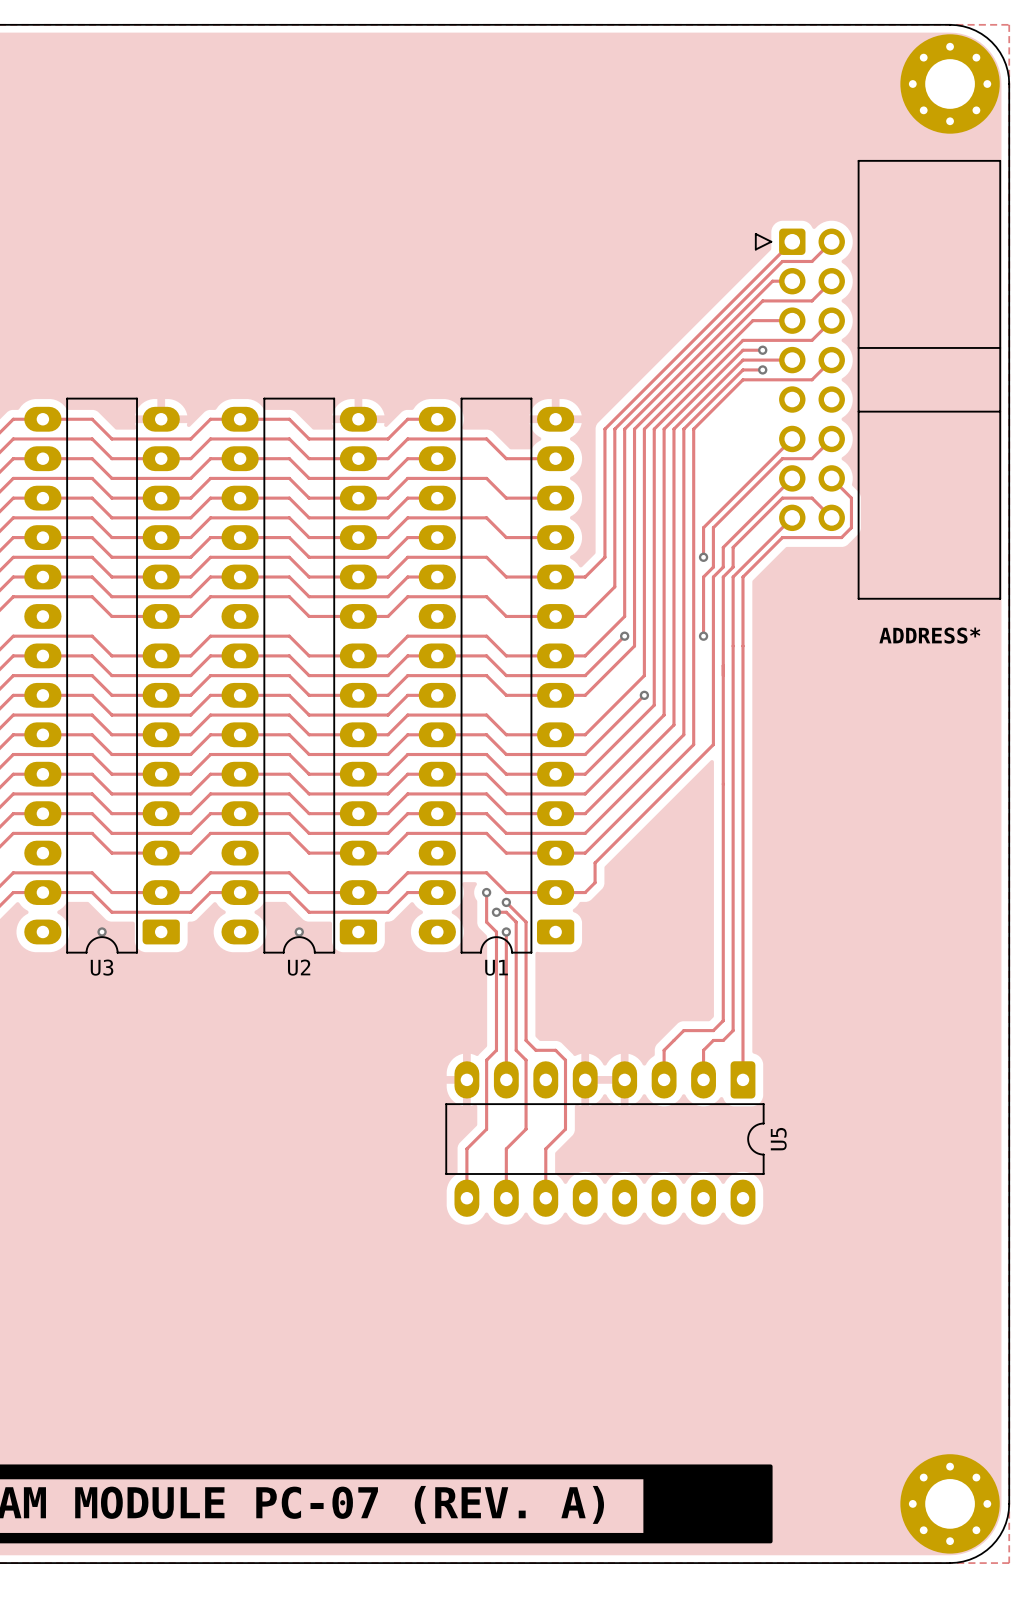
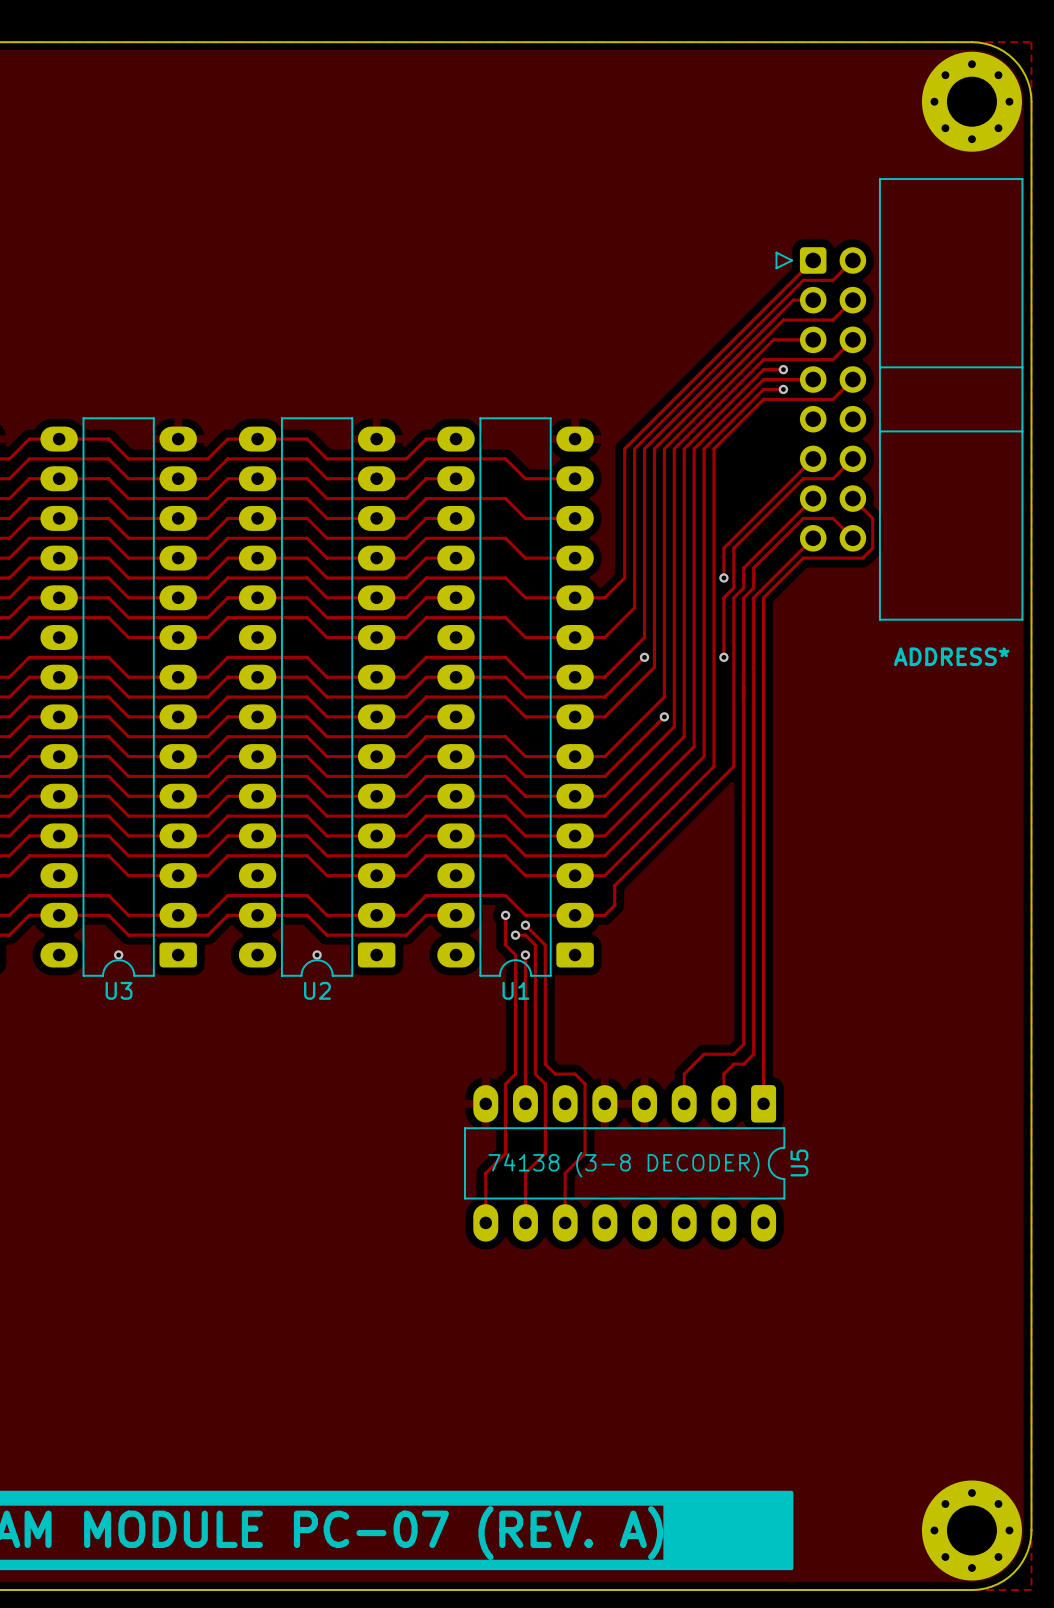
text: none -> 74138 (3-8 DECODER) (623, 1164)

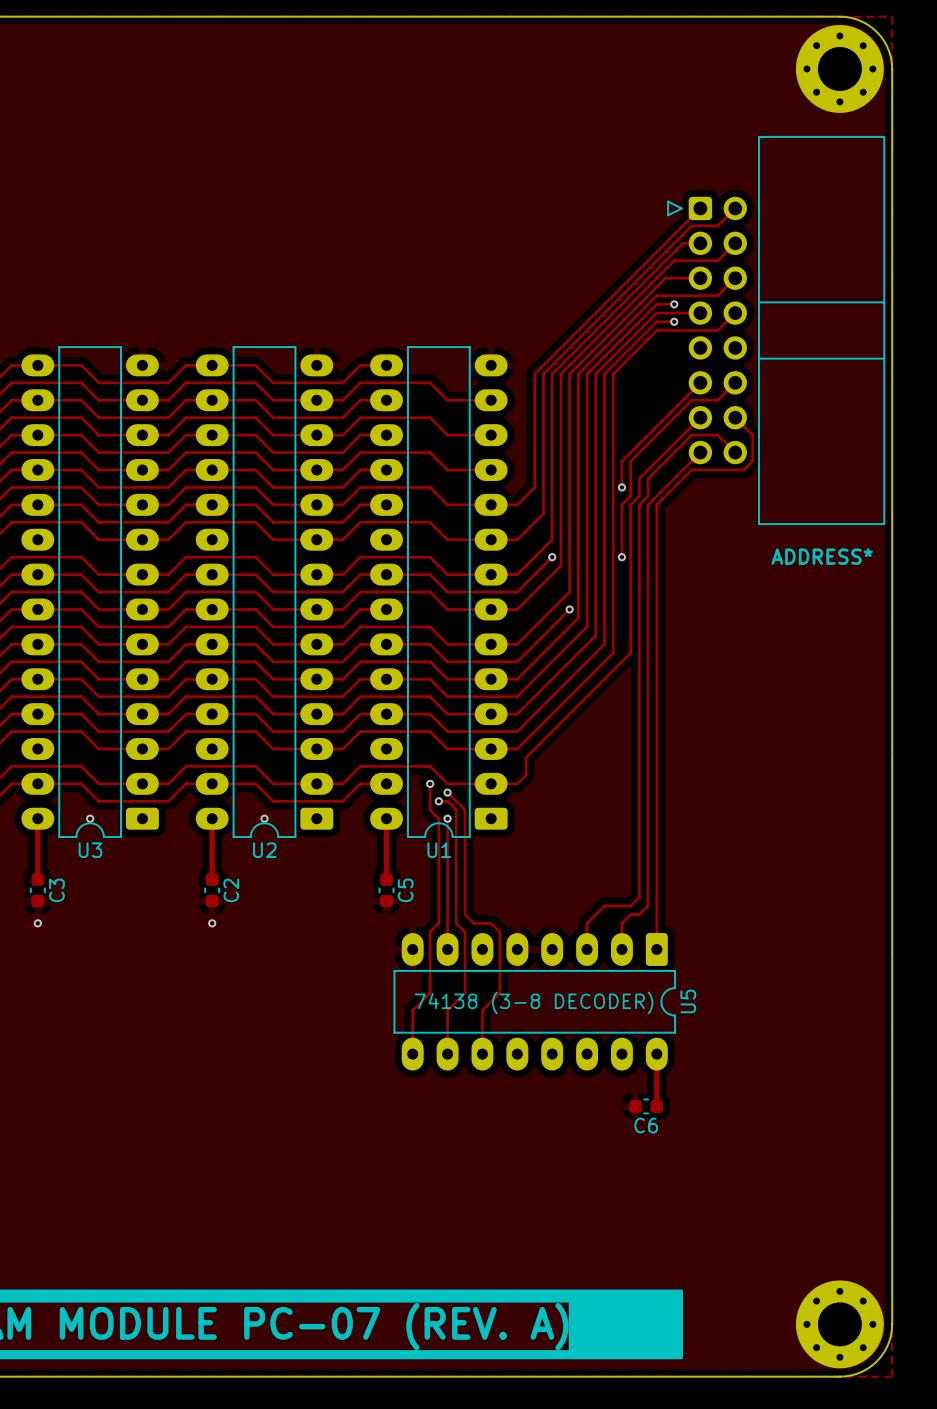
track: none -> (37, 818) (37, 879)
track: none -> (212, 818) (212, 879)
track: none -> (386, 818) (386, 879)
C3: none -> (37, 890)
C2: none -> (212, 890)
C5: none -> (386, 890)
via: none -> (37, 923)
via: none -> (212, 923)
track: none -> (656, 1054) (656, 1106)
C6: none -> (646, 1106)

